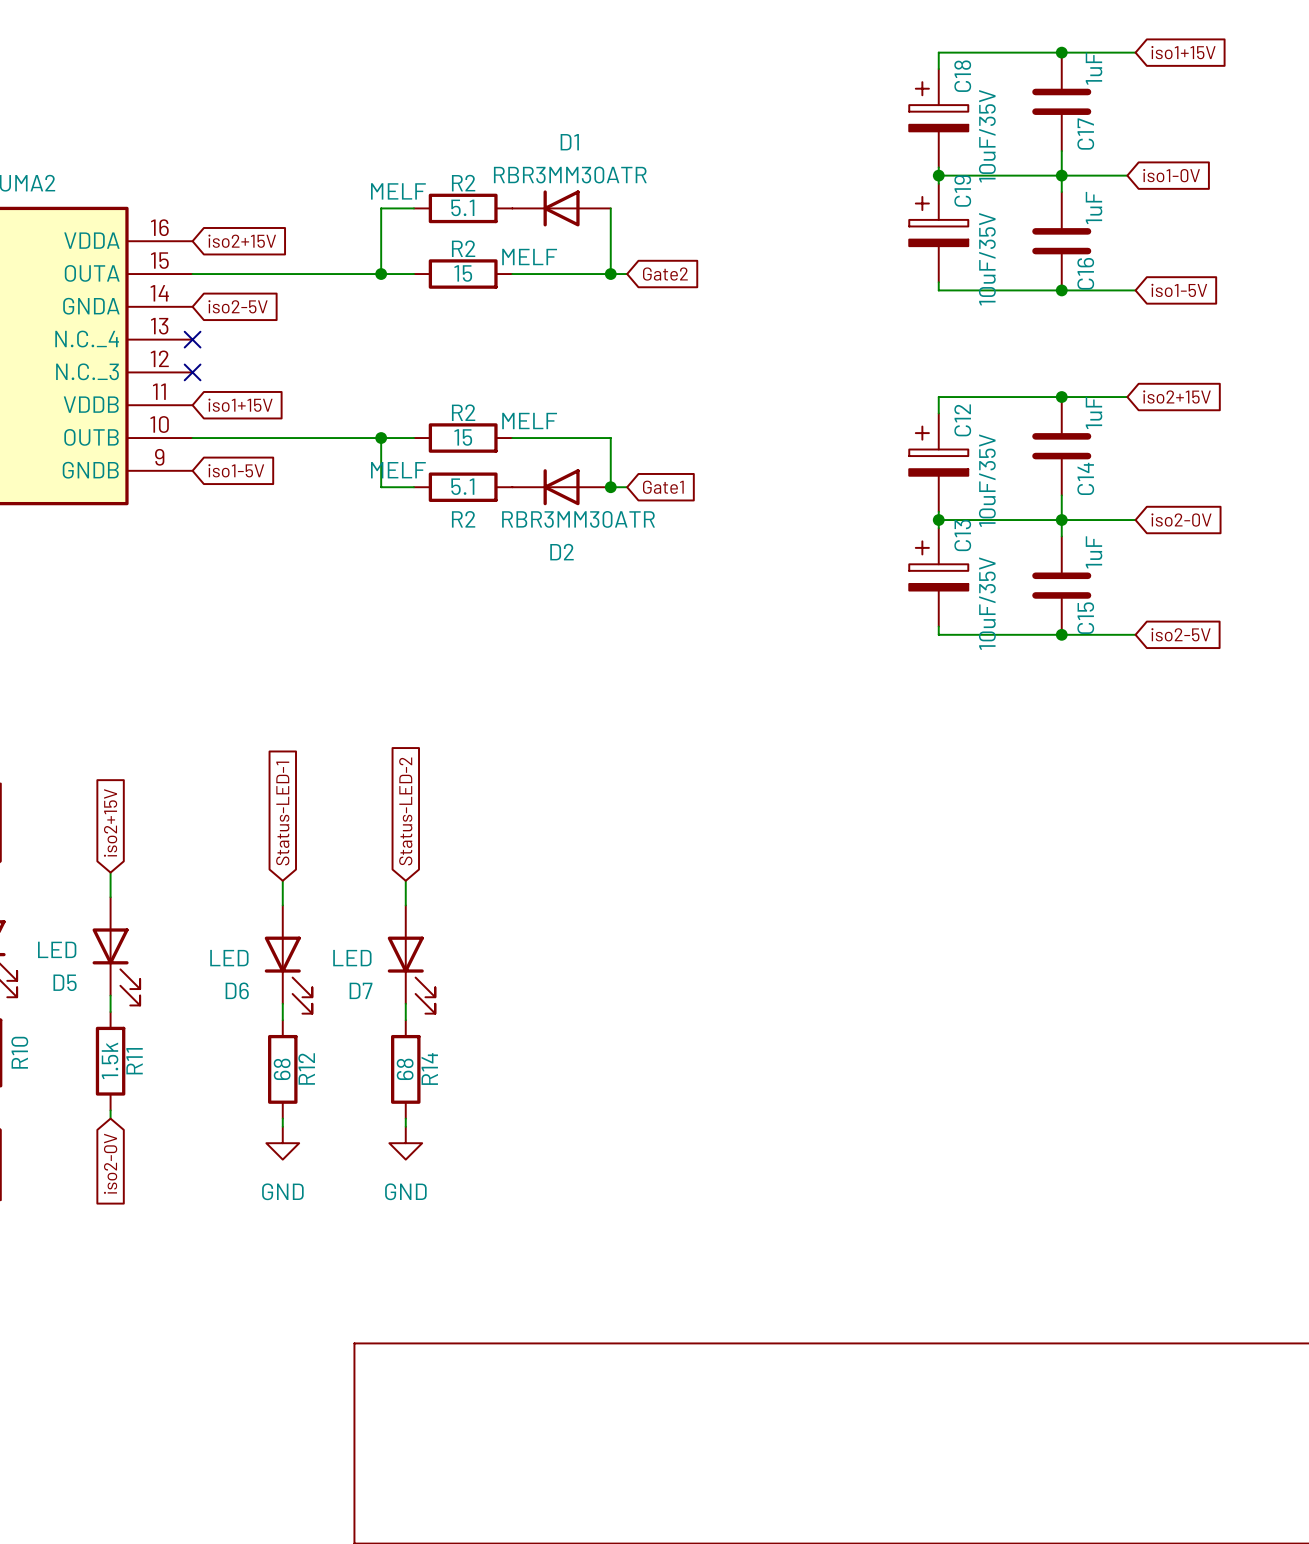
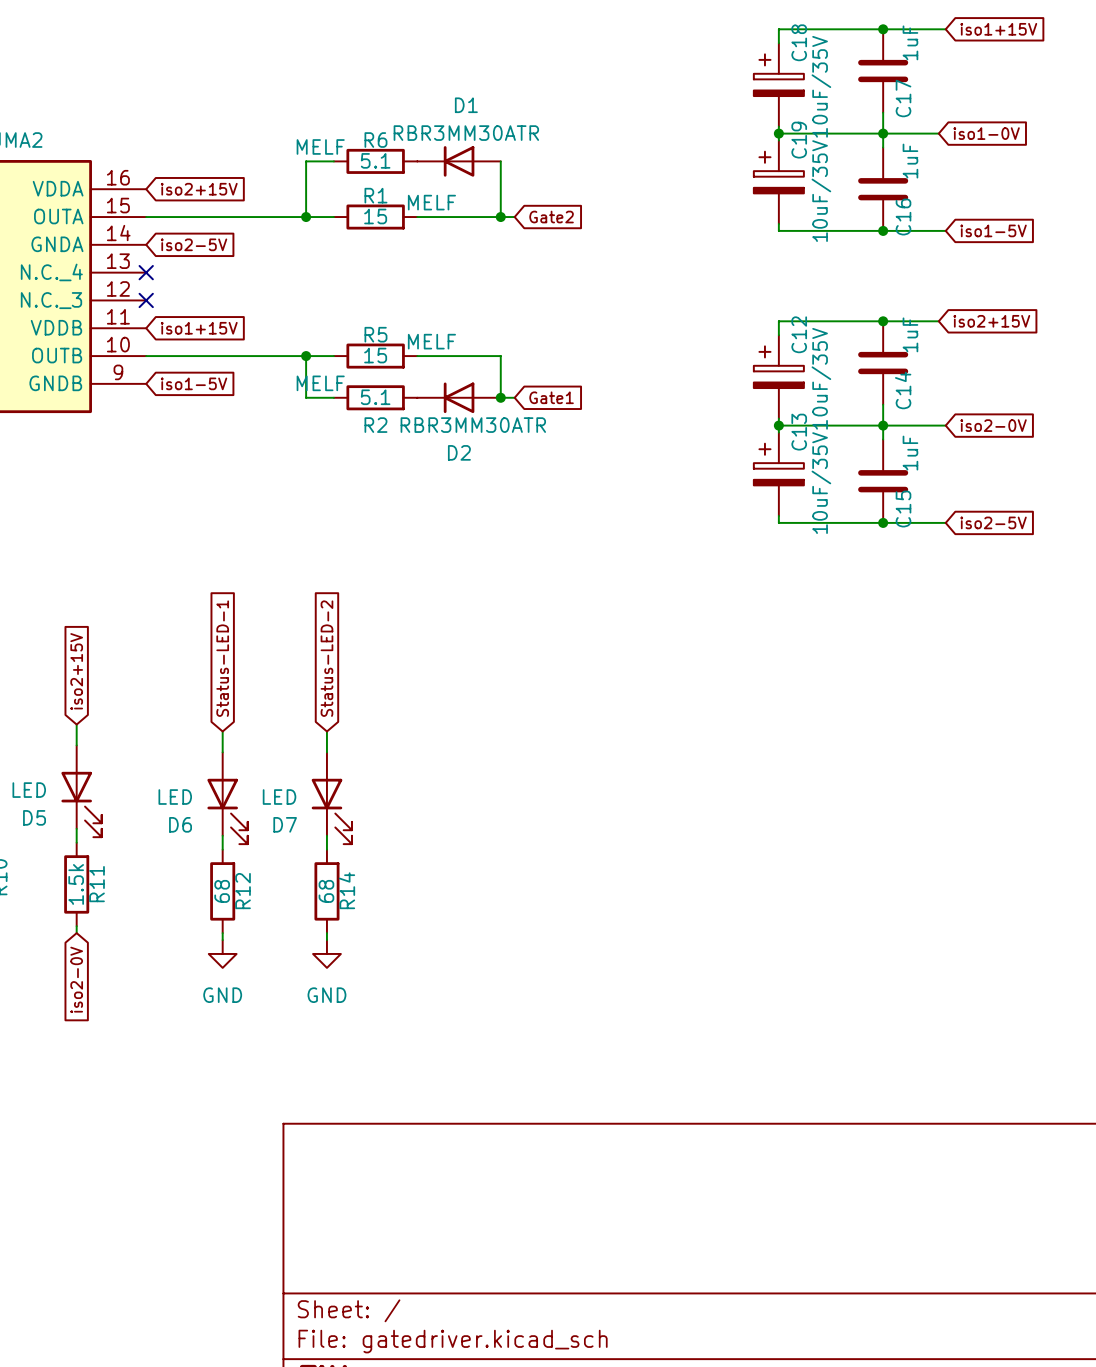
R2 name: R2 (463, 183) -> R6 (375, 140)
R2 name: R2 (463, 248) -> R1 (375, 195)
R2 name: R2 (463, 412) -> R5 (375, 334)

